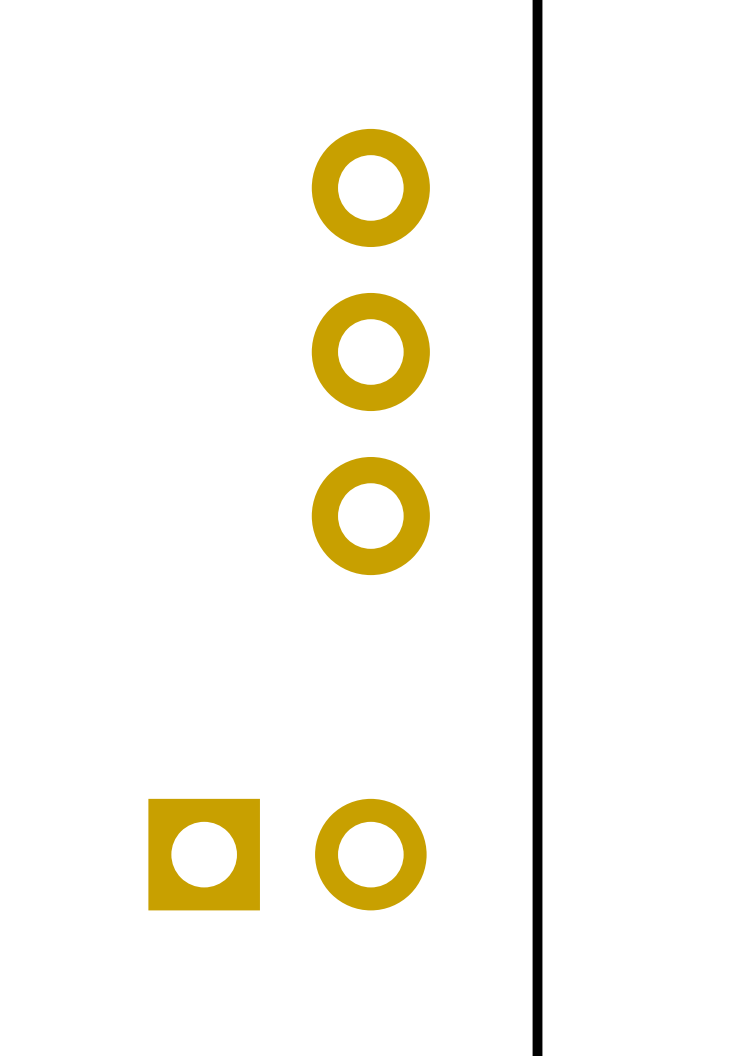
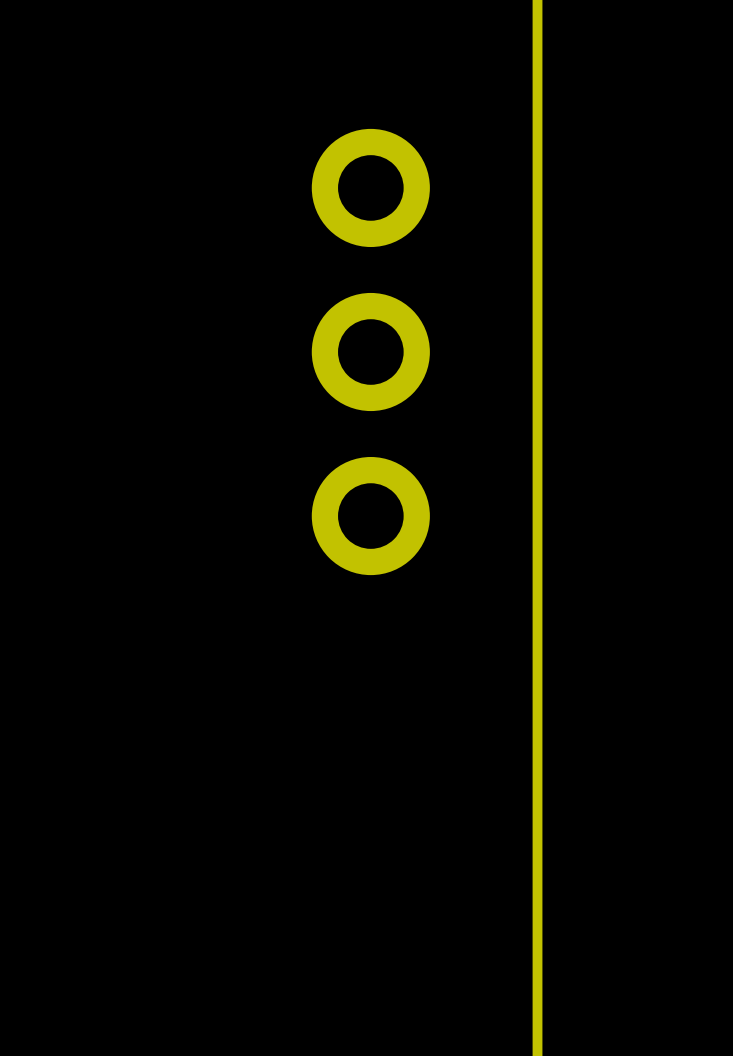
part: (287, 854) -> none

